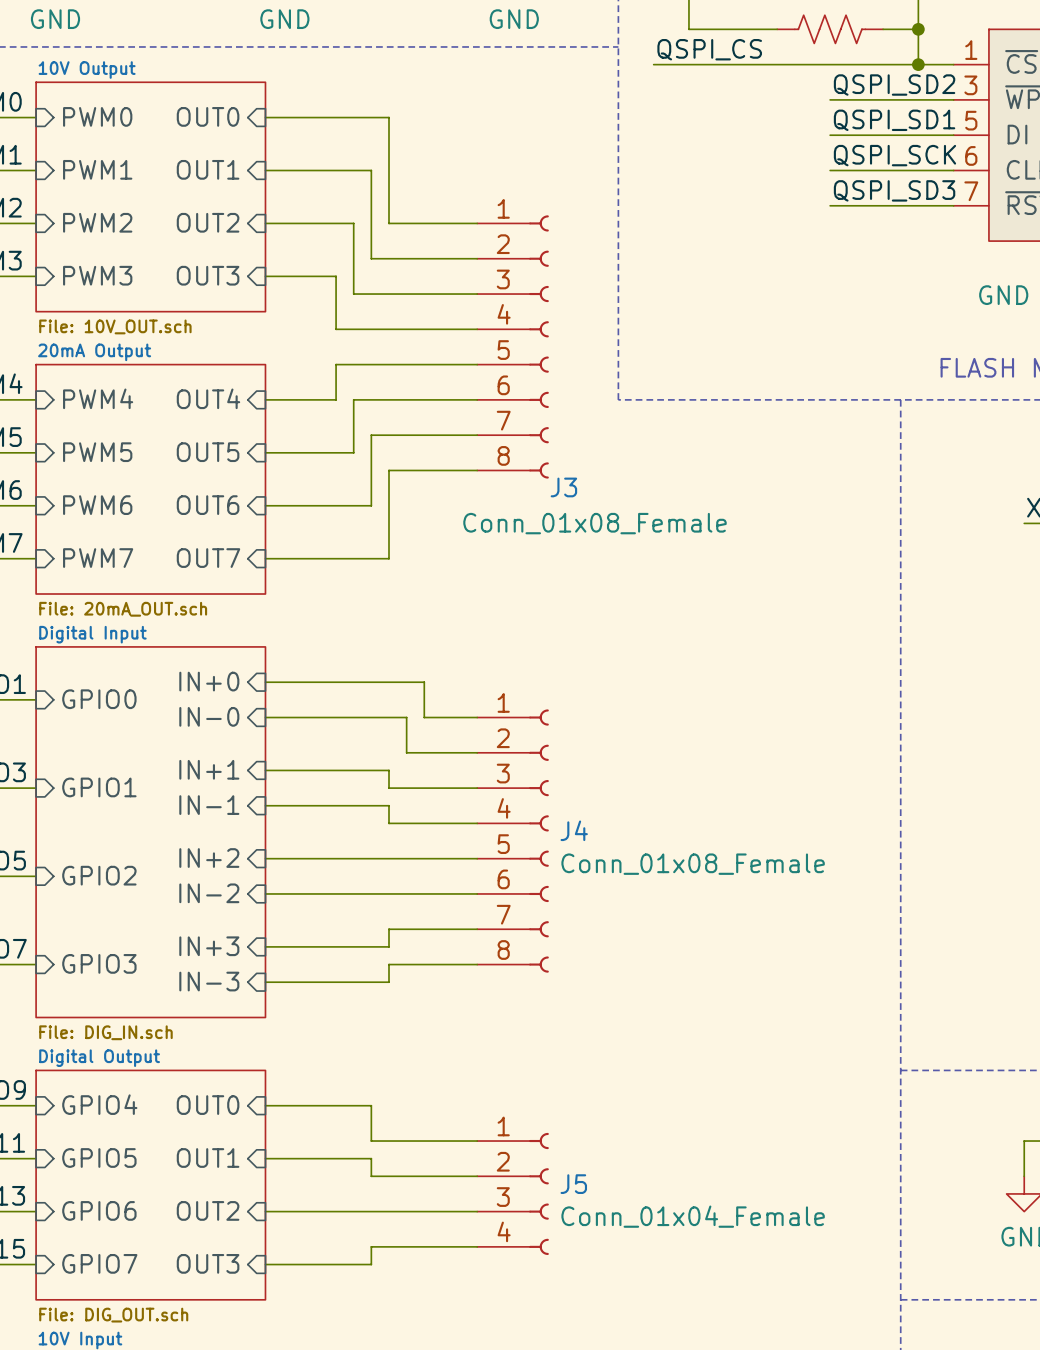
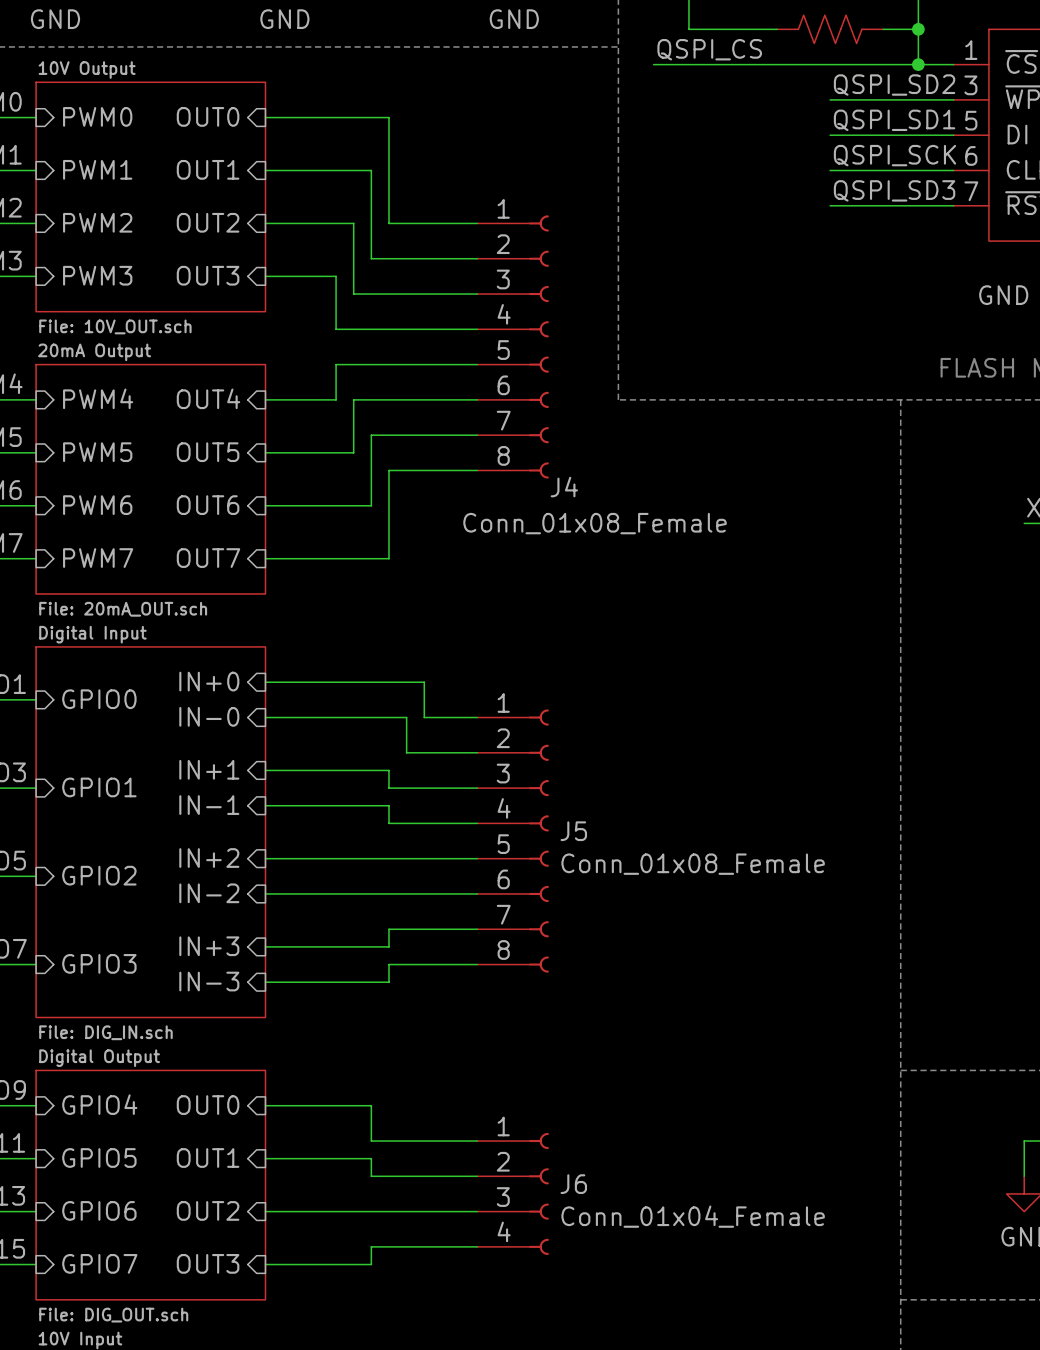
J3 name: J3 (563, 487) -> J4 (564, 487)
J4 name: J4 (574, 830) -> J5 (573, 831)
J5 name: J5 (573, 1184) -> J6 (573, 1184)

